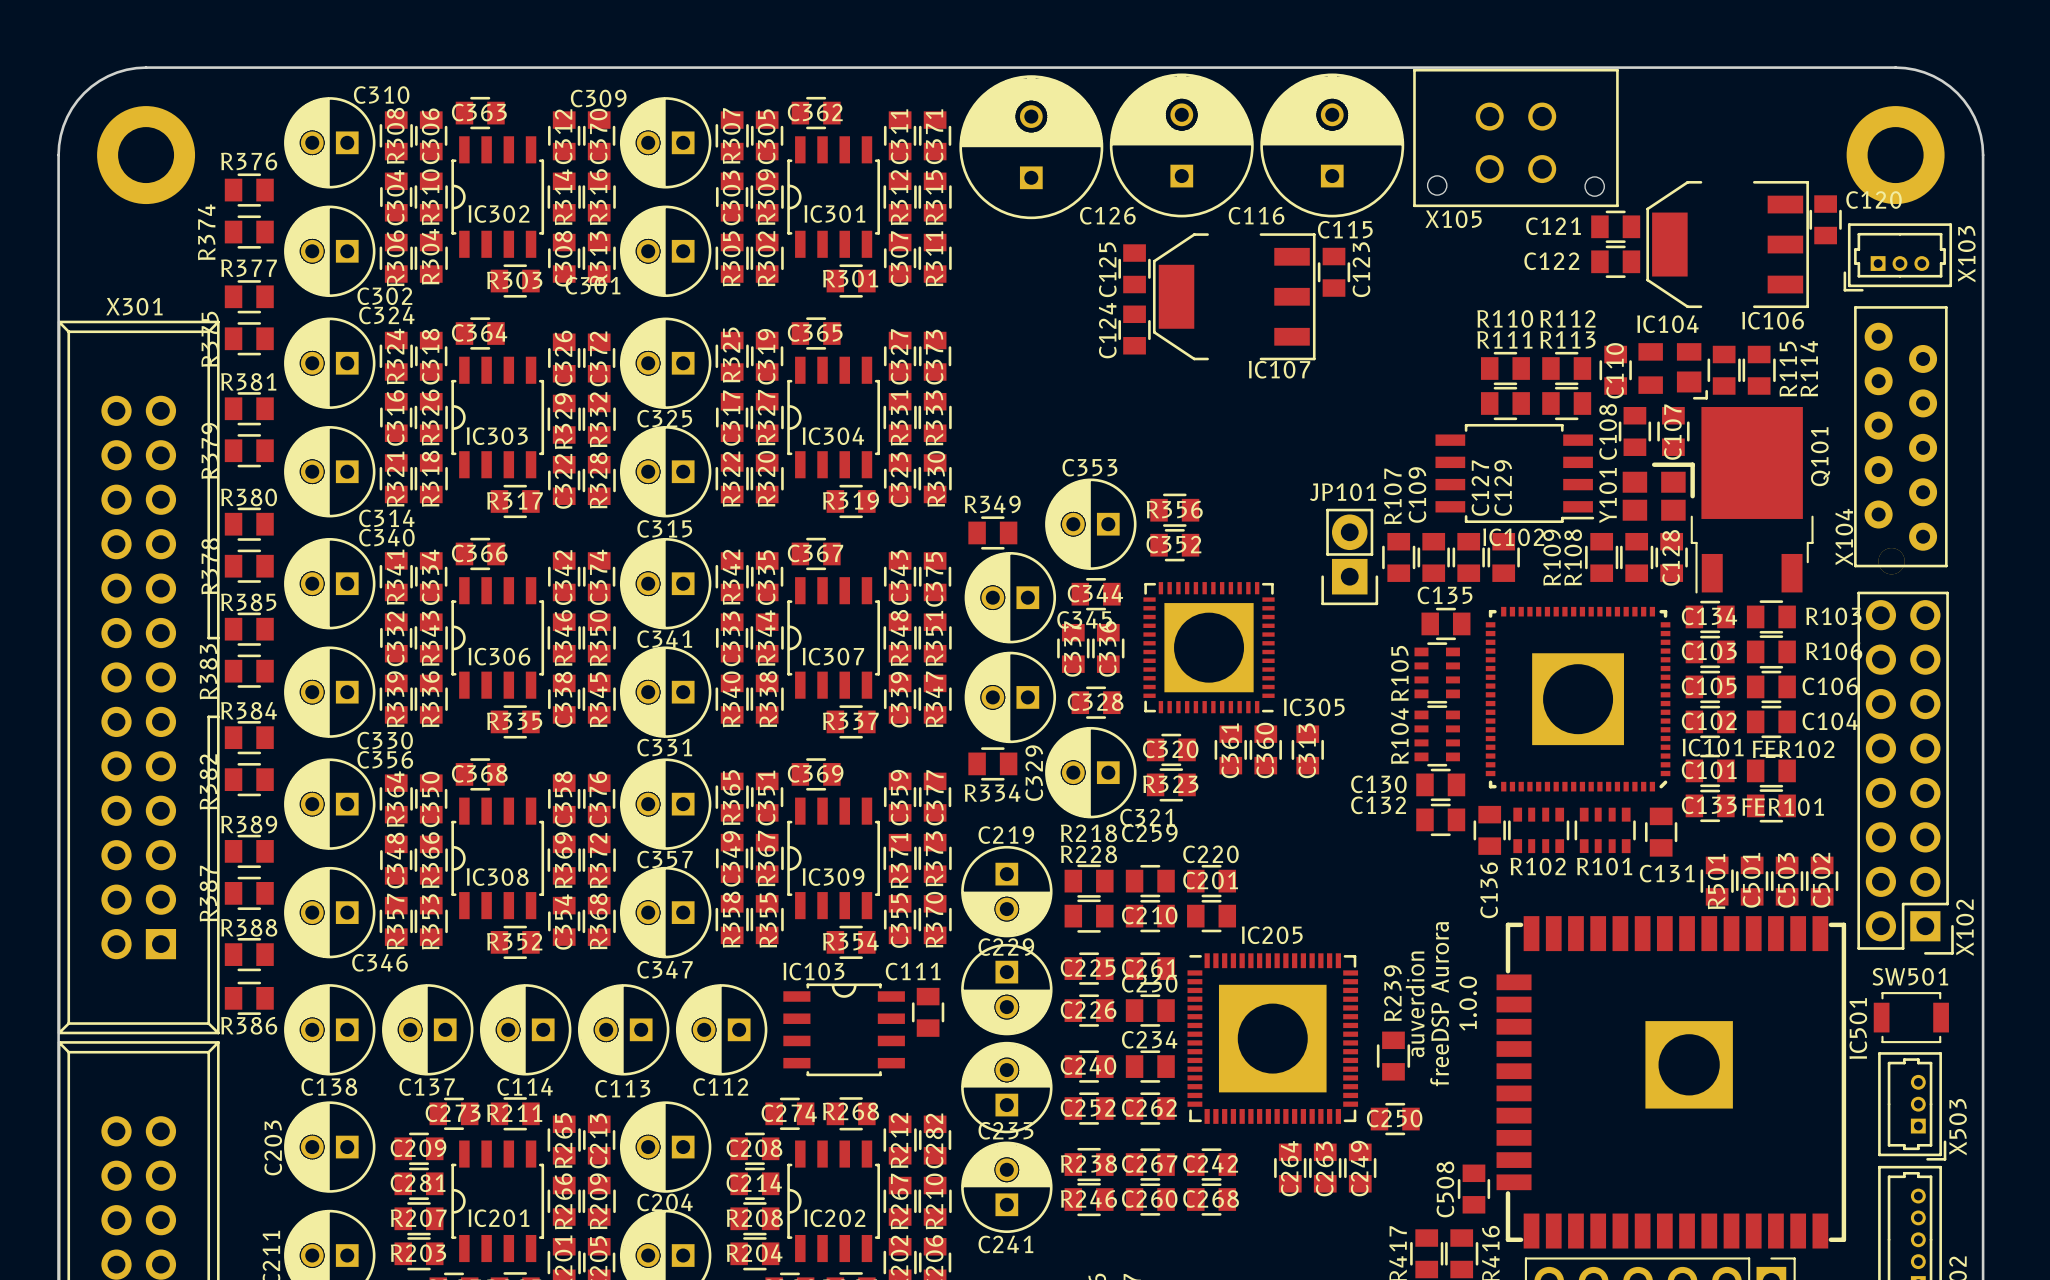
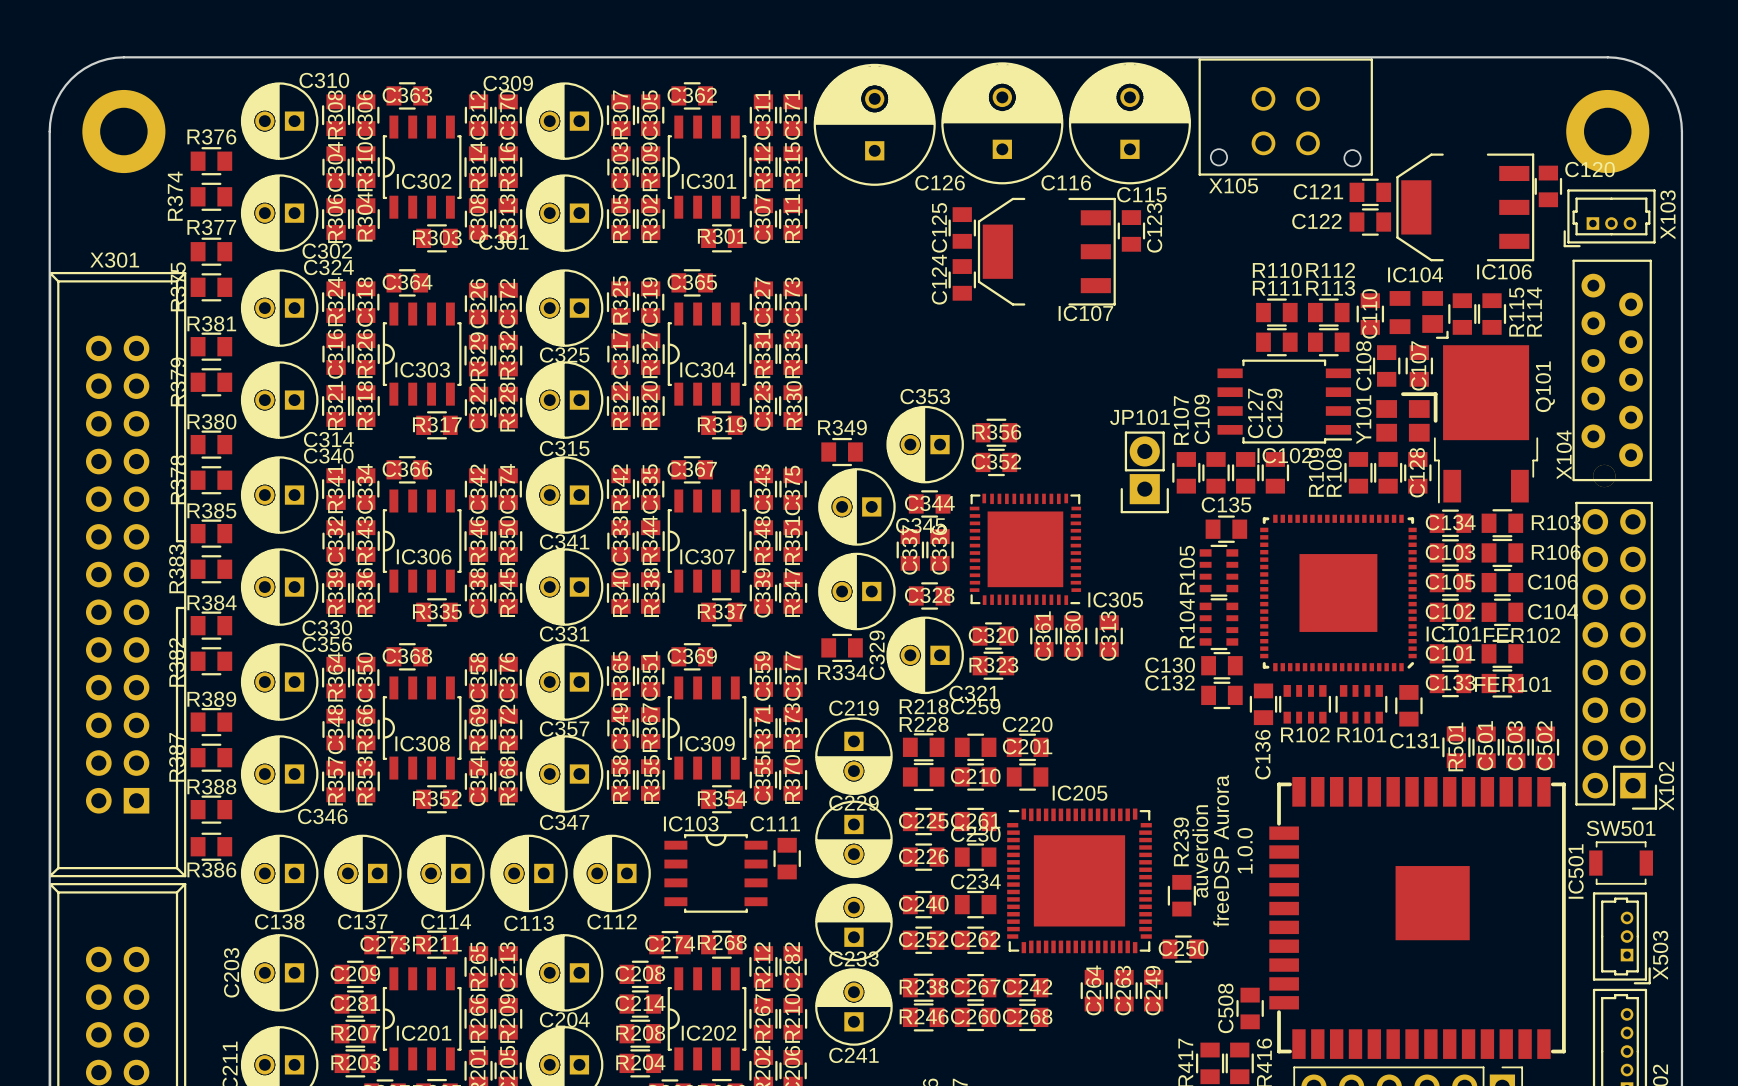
IC305 footprint: [1143, 582, 1275, 714] -> [969, 493, 1082, 605]
IC101 footprint: [1485, 606, 1671, 792] -> [1260, 514, 1417, 672]
IC501 footprint: [1496, 916, 1847, 1249] -> [1269, 777, 1566, 1059]
IC205 footprint: [1187, 953, 1359, 1124] -> [1007, 808, 1152, 954]

